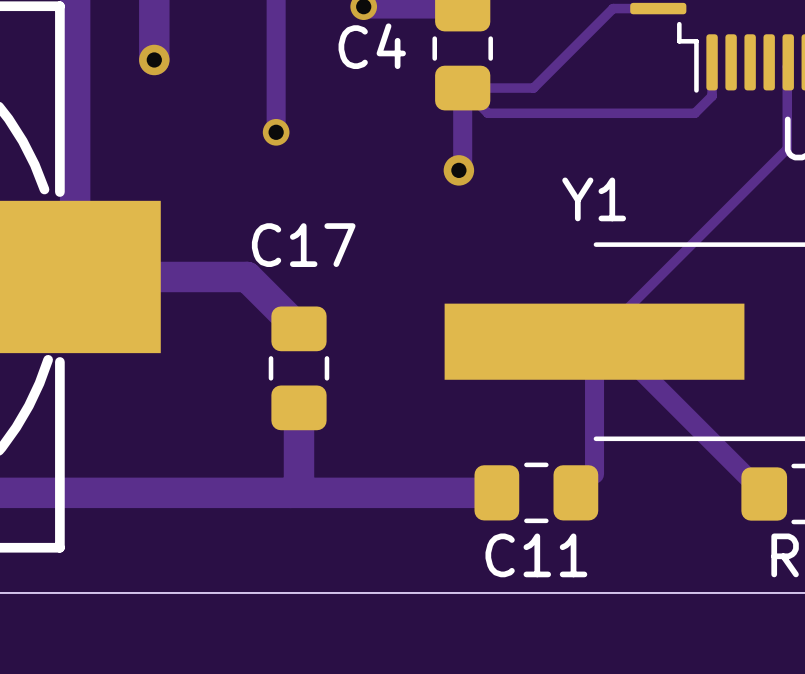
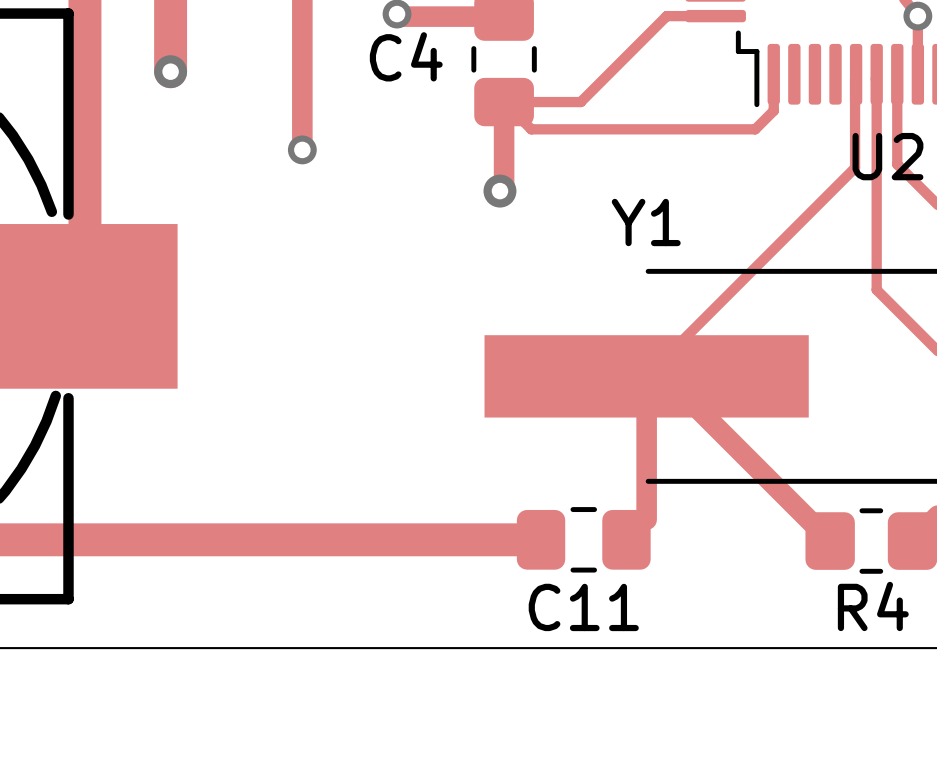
track: (75, 276) (247, 276) (298, 328) -> none
C17: (298, 368) -> none
track: (298, 407) (298, 484) (290, 492) -> none

